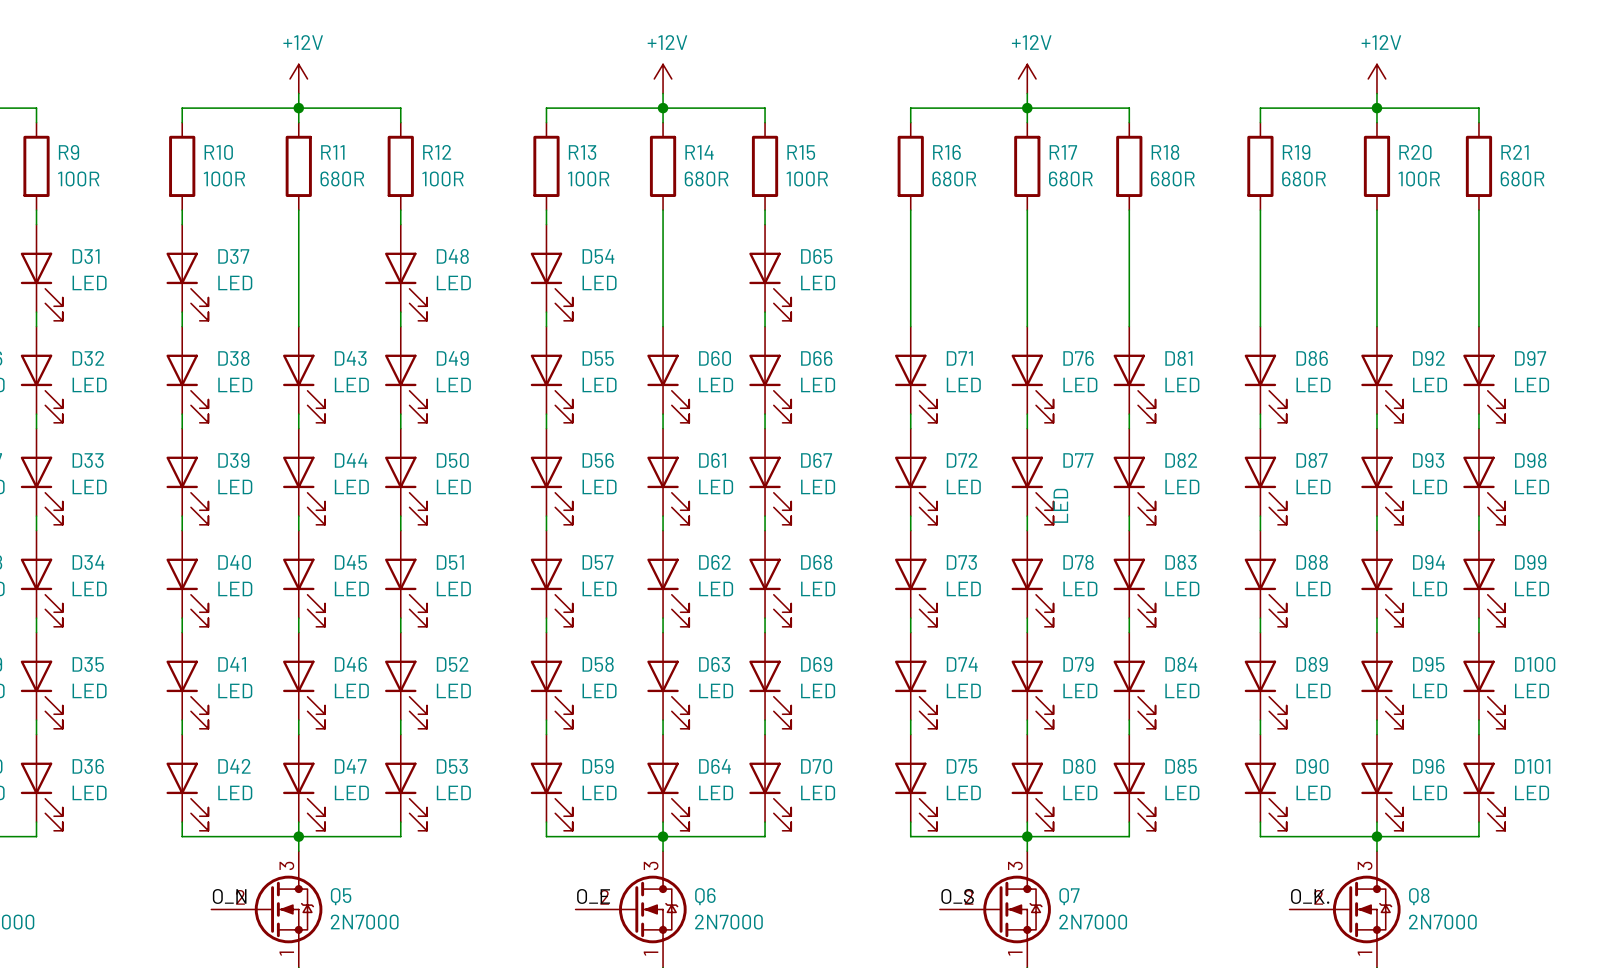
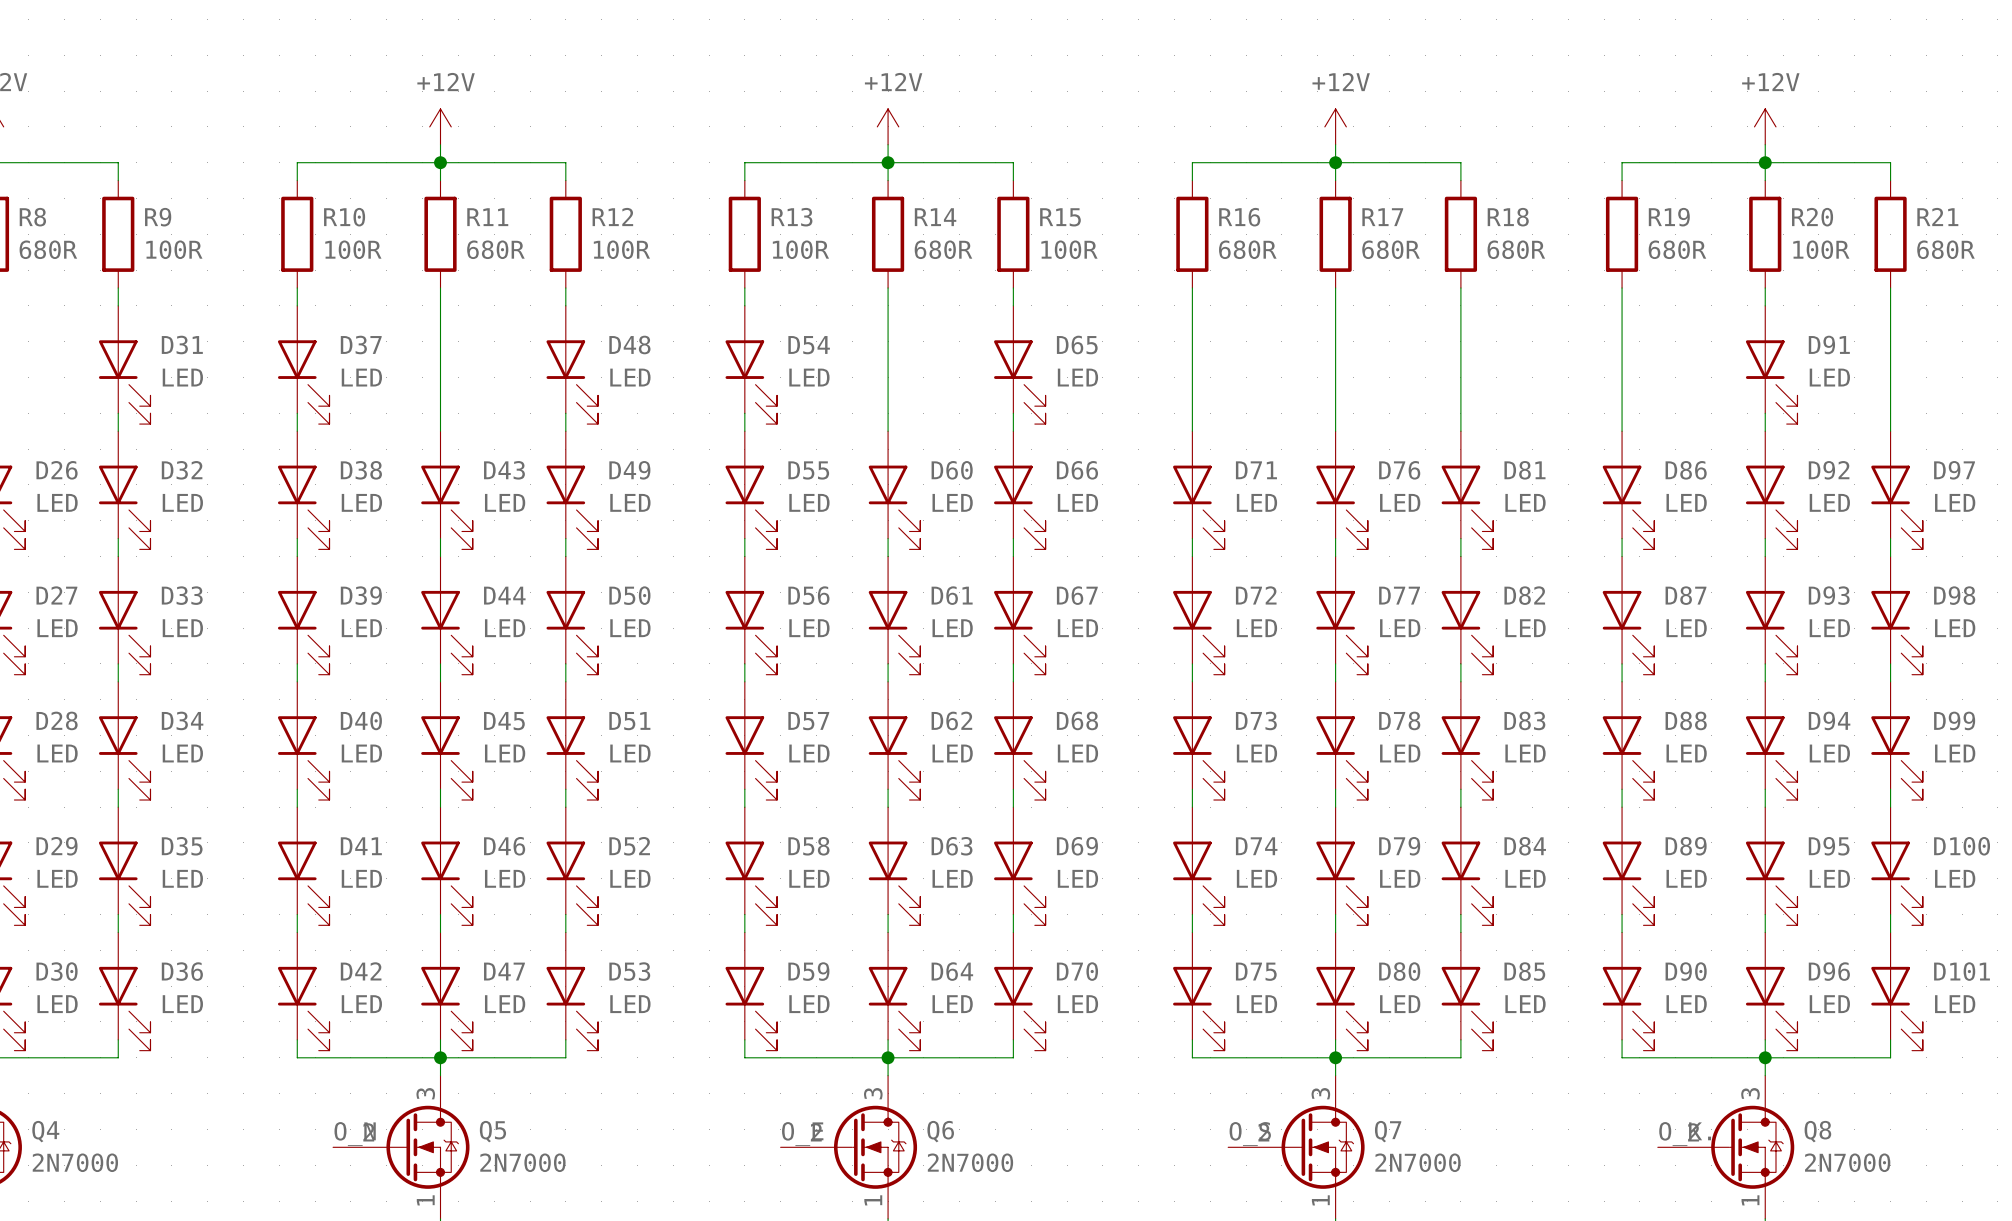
D91: none -> LED (1771, 364)
D77 value rotation: 0° (1060, 505) -> 90° clockwise (1400, 628)

